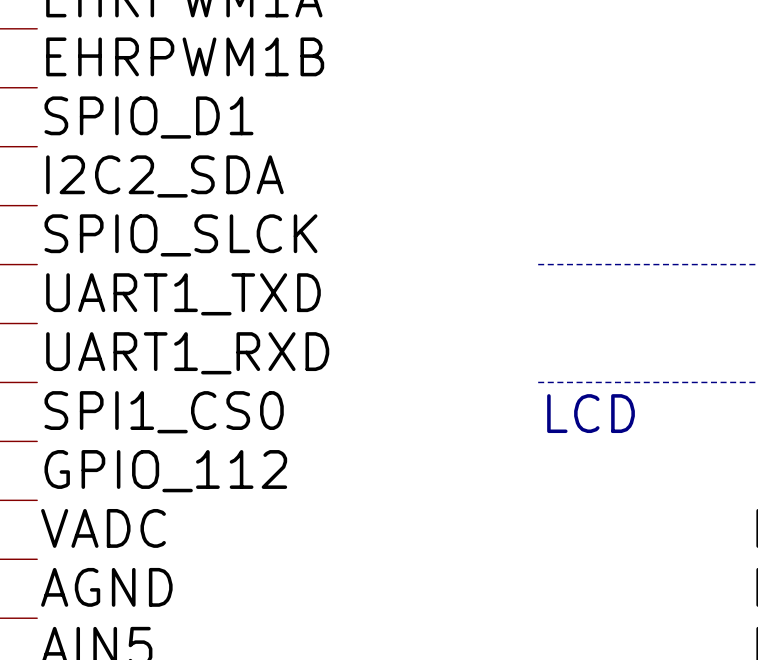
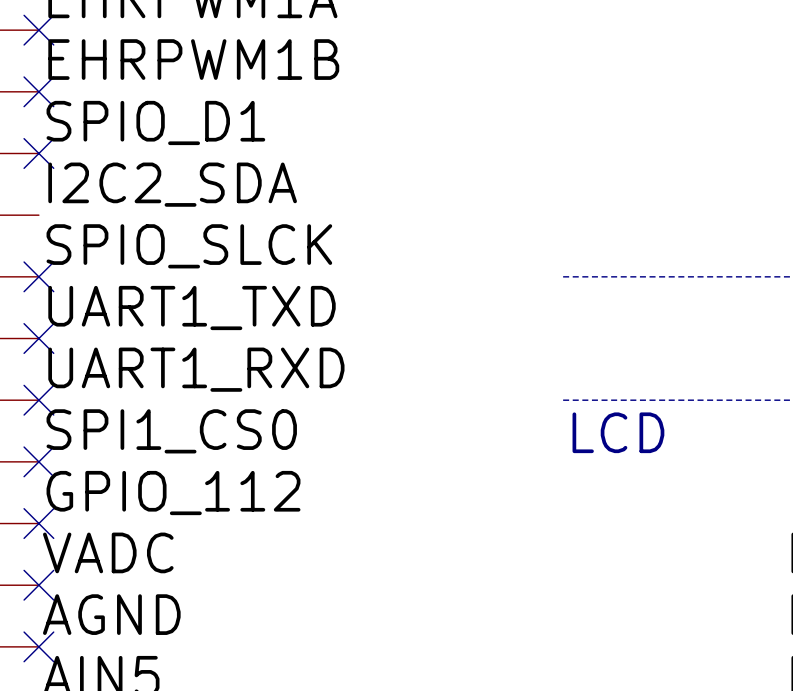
no-connect mark: none -> (38, 30)
no-connect mark: none -> (38, 91)
no-connect mark: none -> (38, 153)
no-connect mark: none -> (38, 276)
no-connect mark: none -> (38, 338)
no-connect mark: none -> (38, 400)
no-connect mark: none -> (38, 461)
no-connect mark: none -> (38, 523)
no-connect mark: none -> (38, 585)
no-connect mark: none -> (38, 646)

